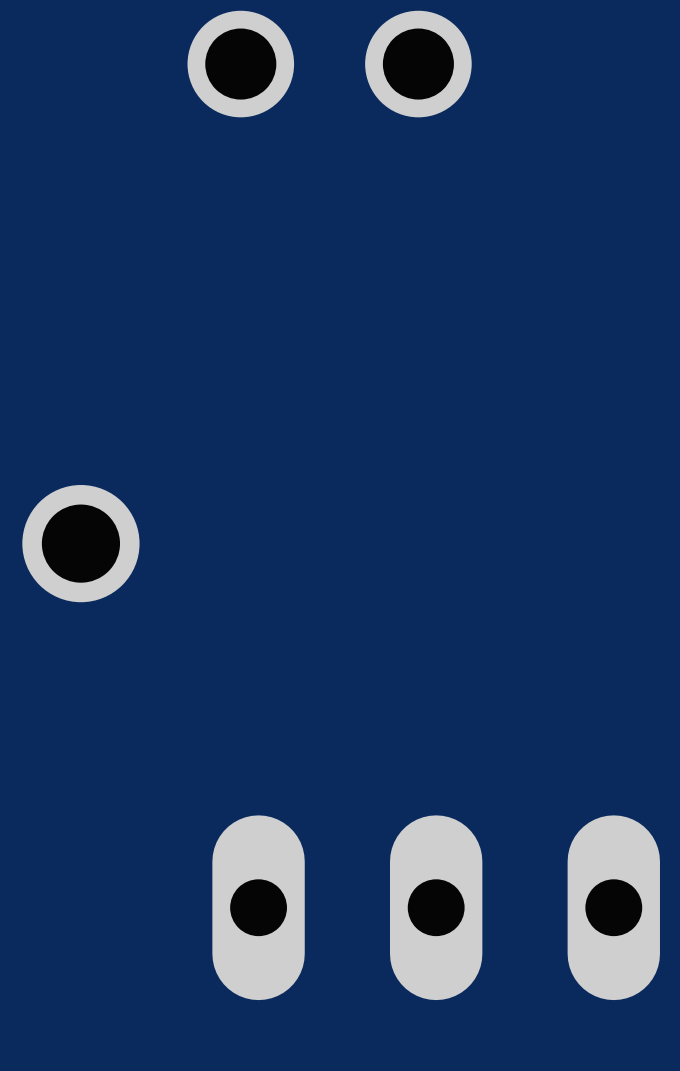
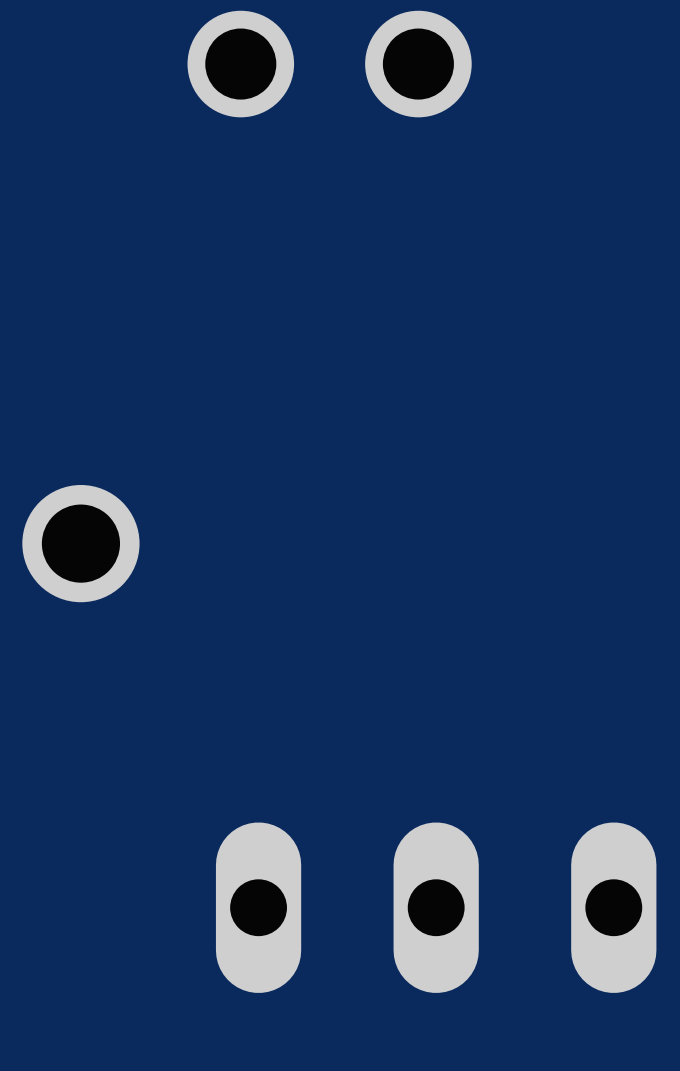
part footprint: [212, 815, 660, 1001] -> [215, 822, 657, 993]

